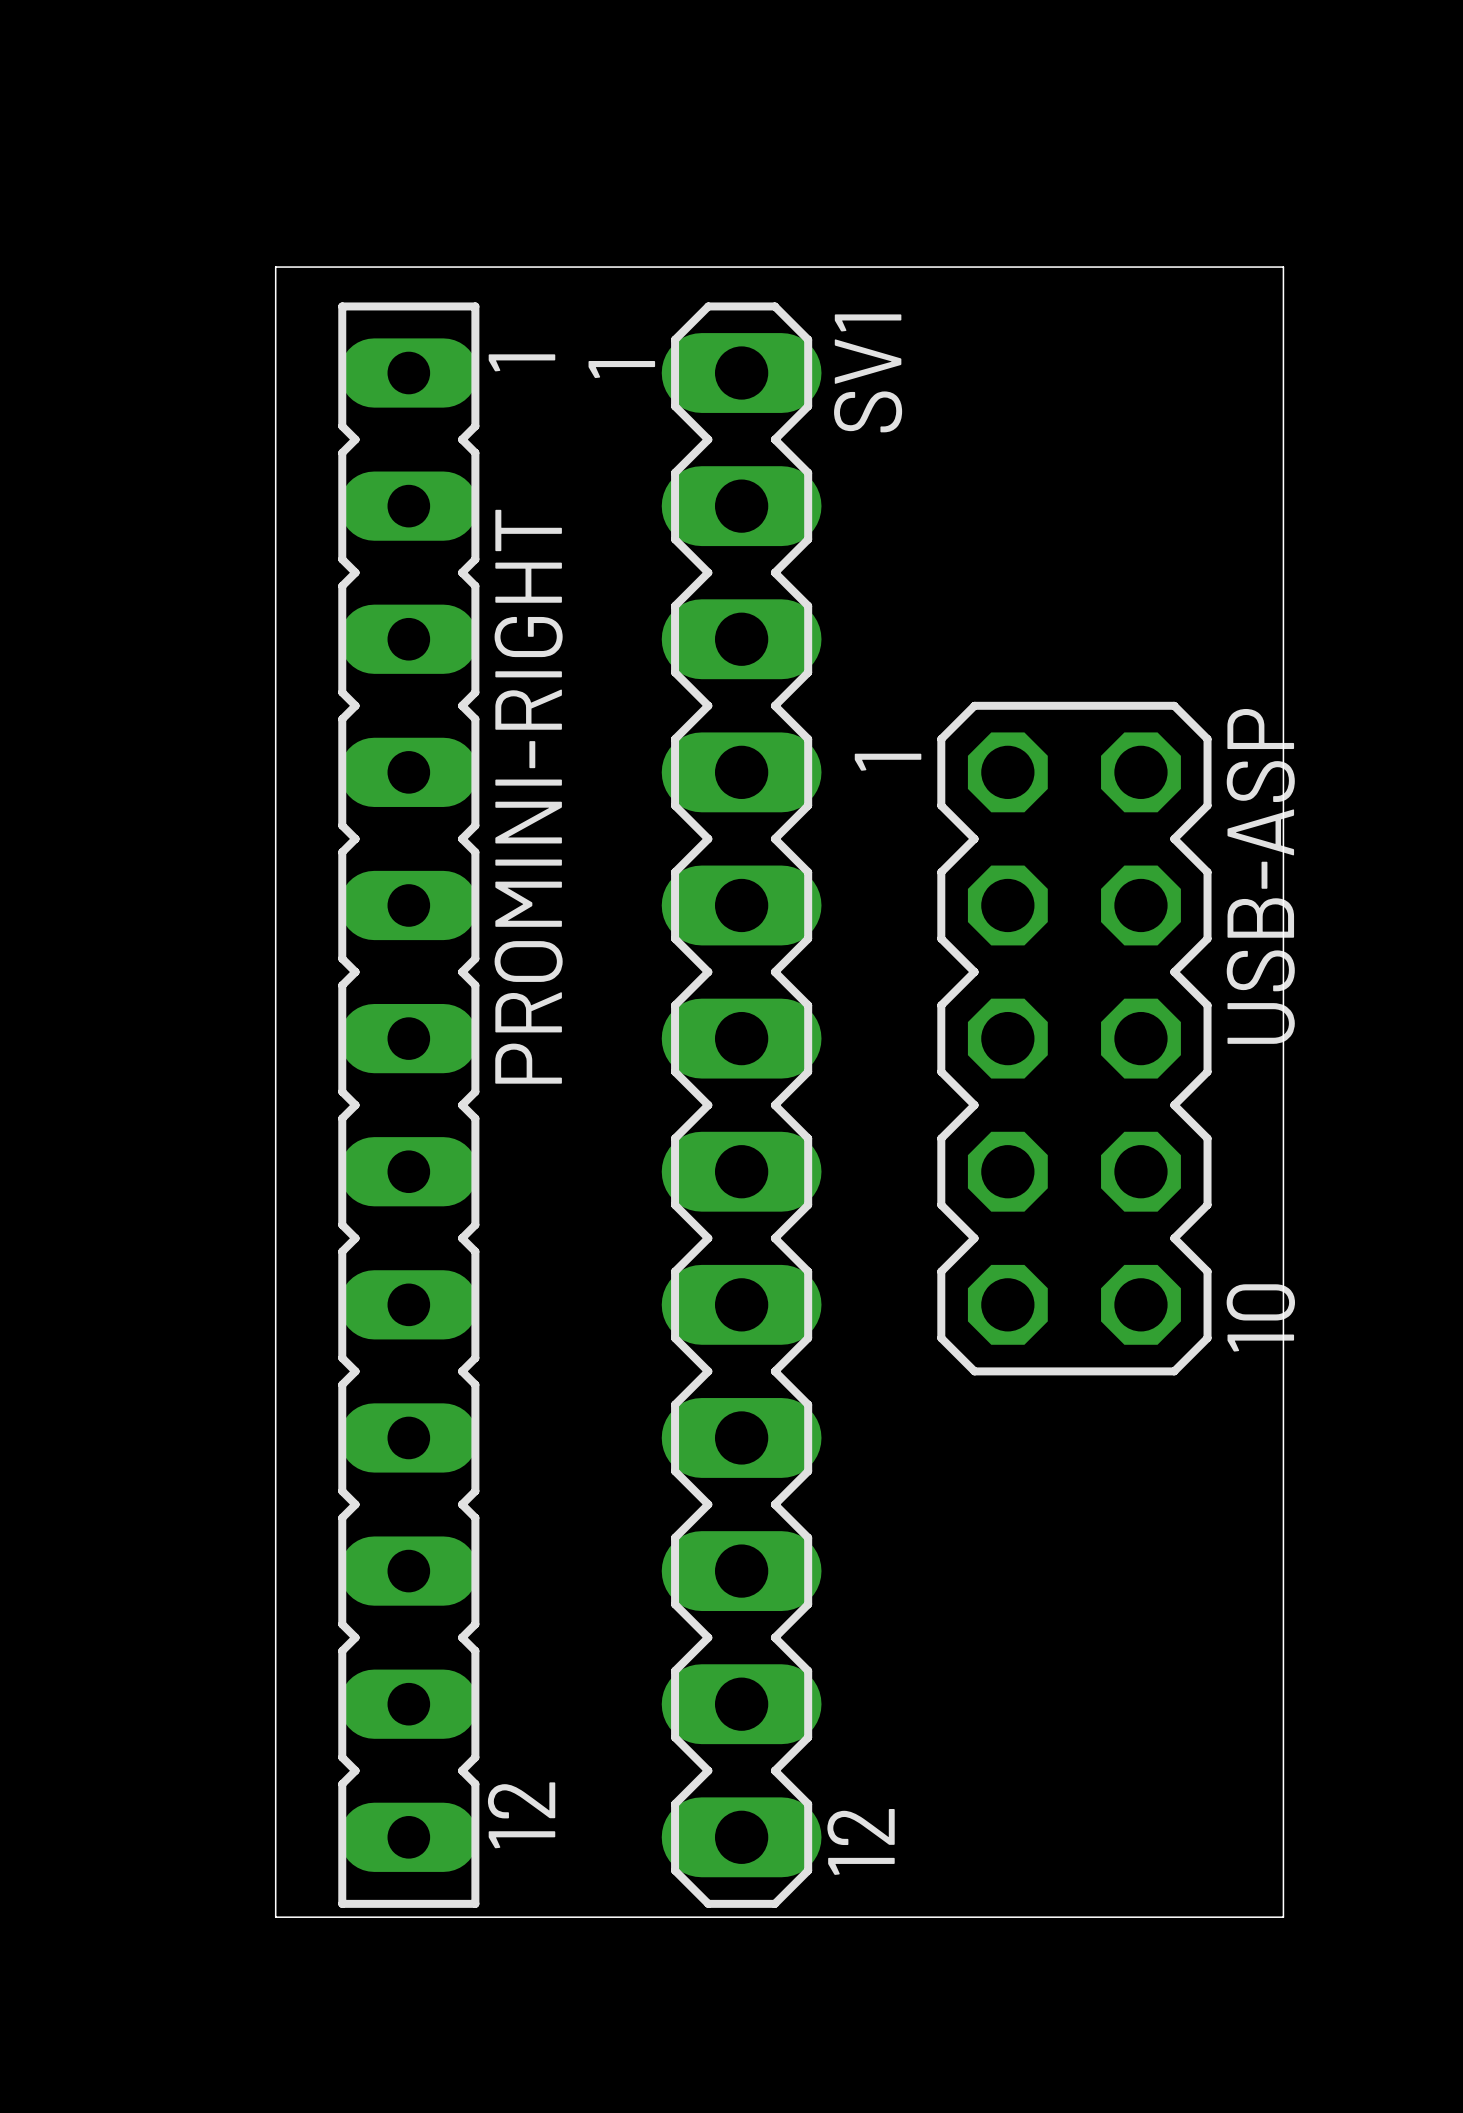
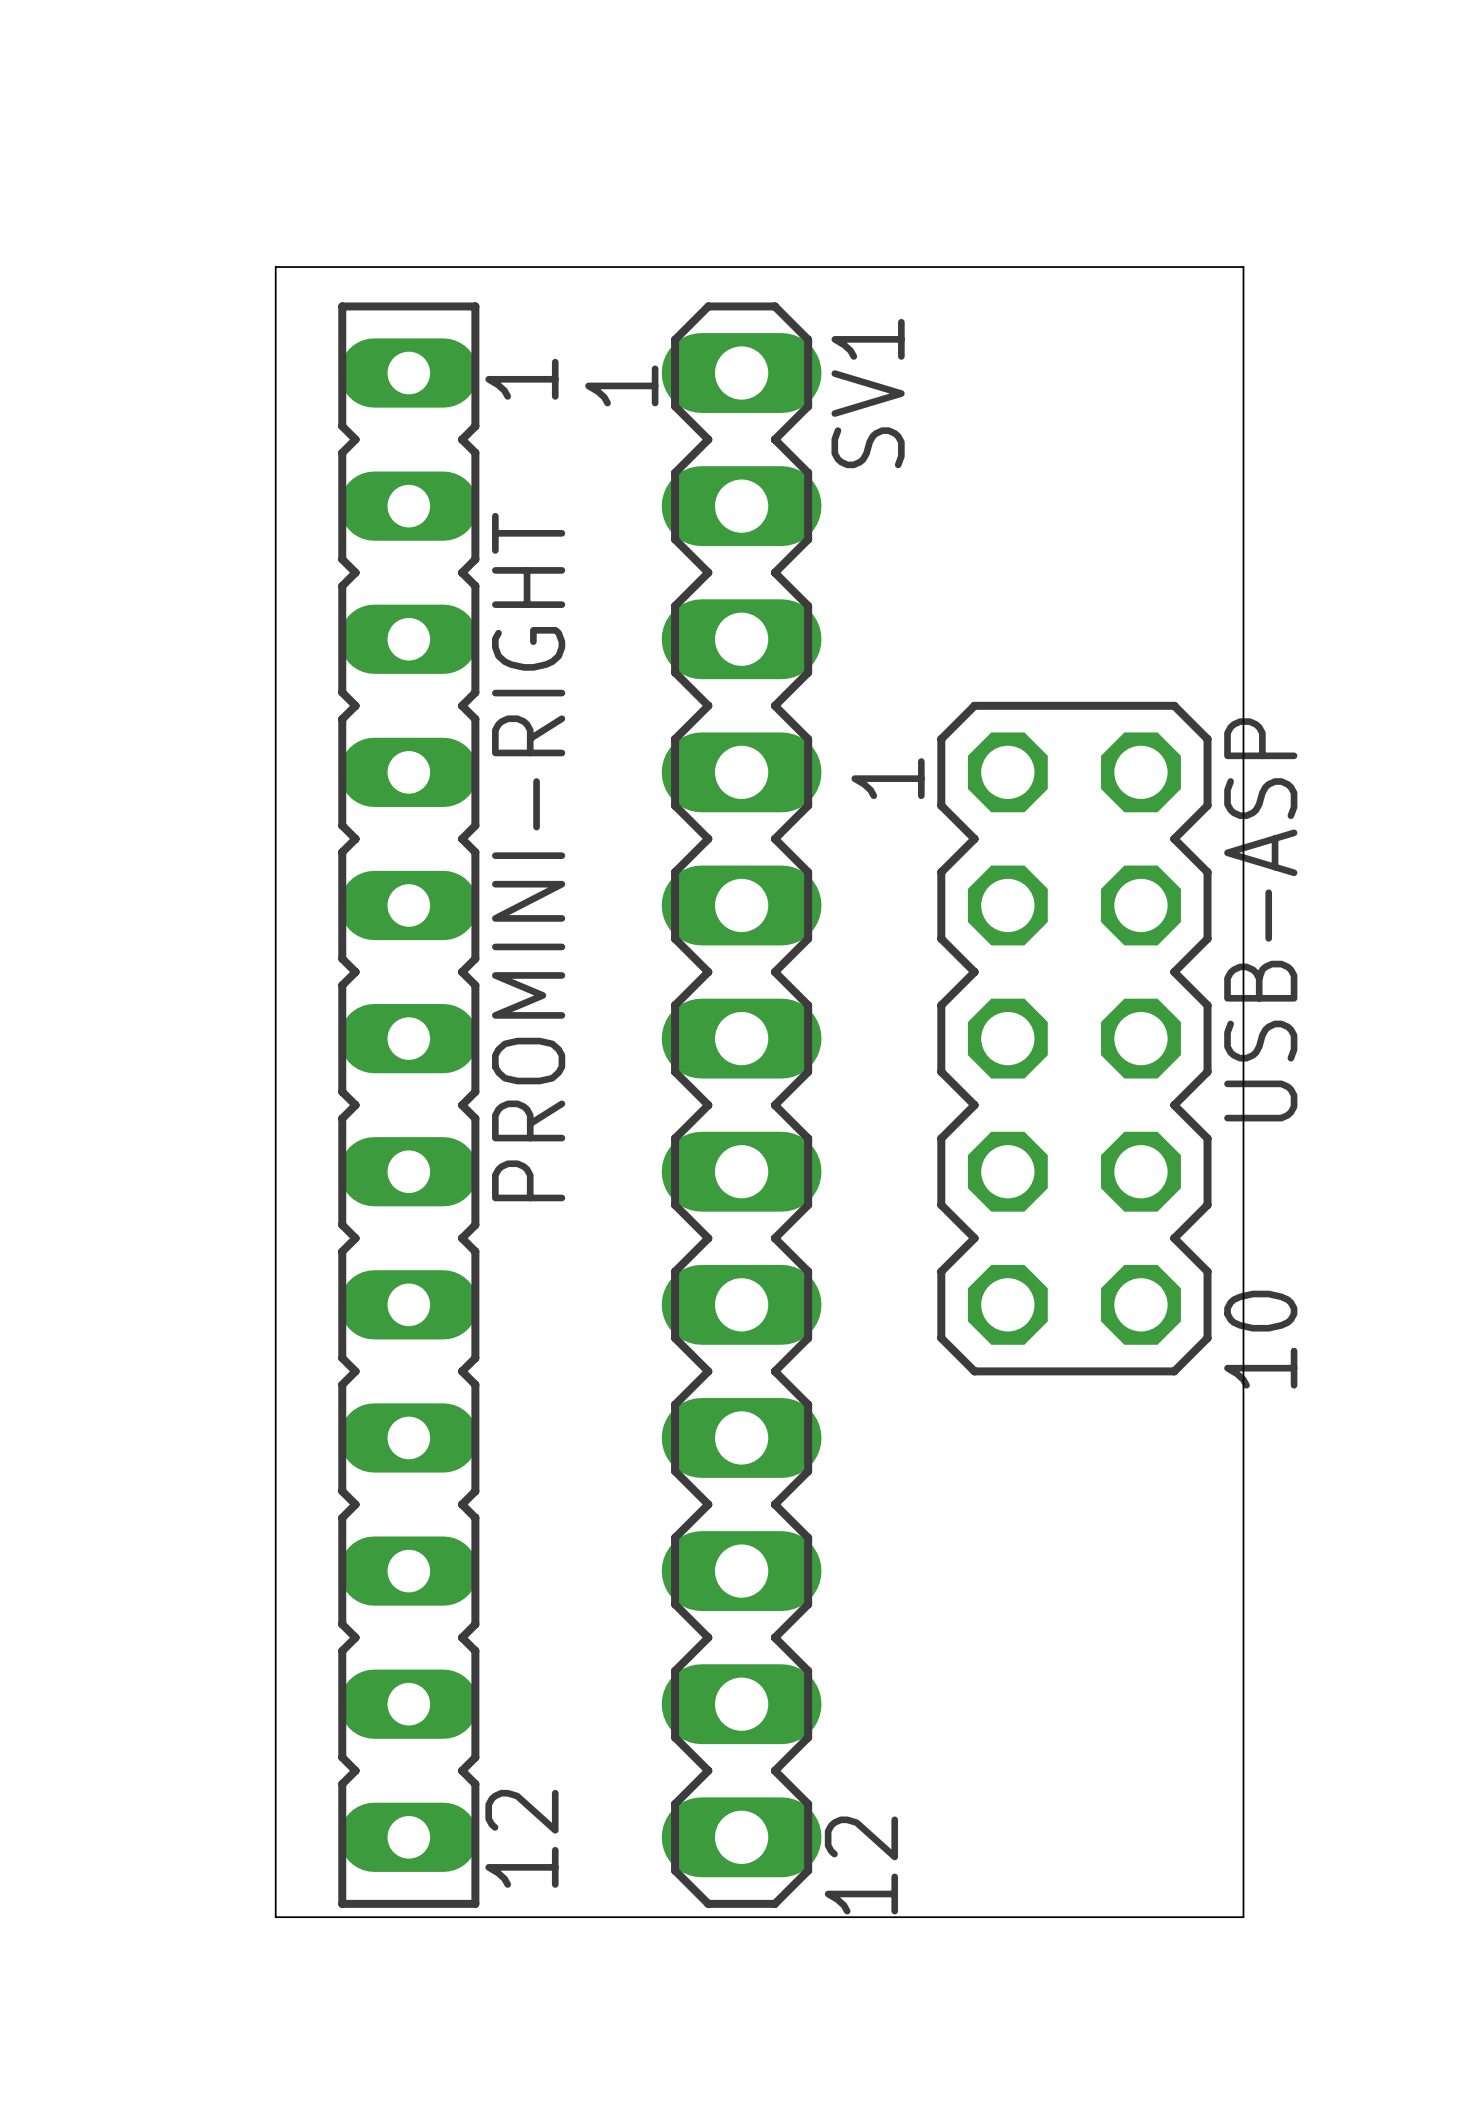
board edge: (1243, 267) (1283, 267) (1283, 1917) (1243, 1917) -> (1243, 267) (1243, 1917)

